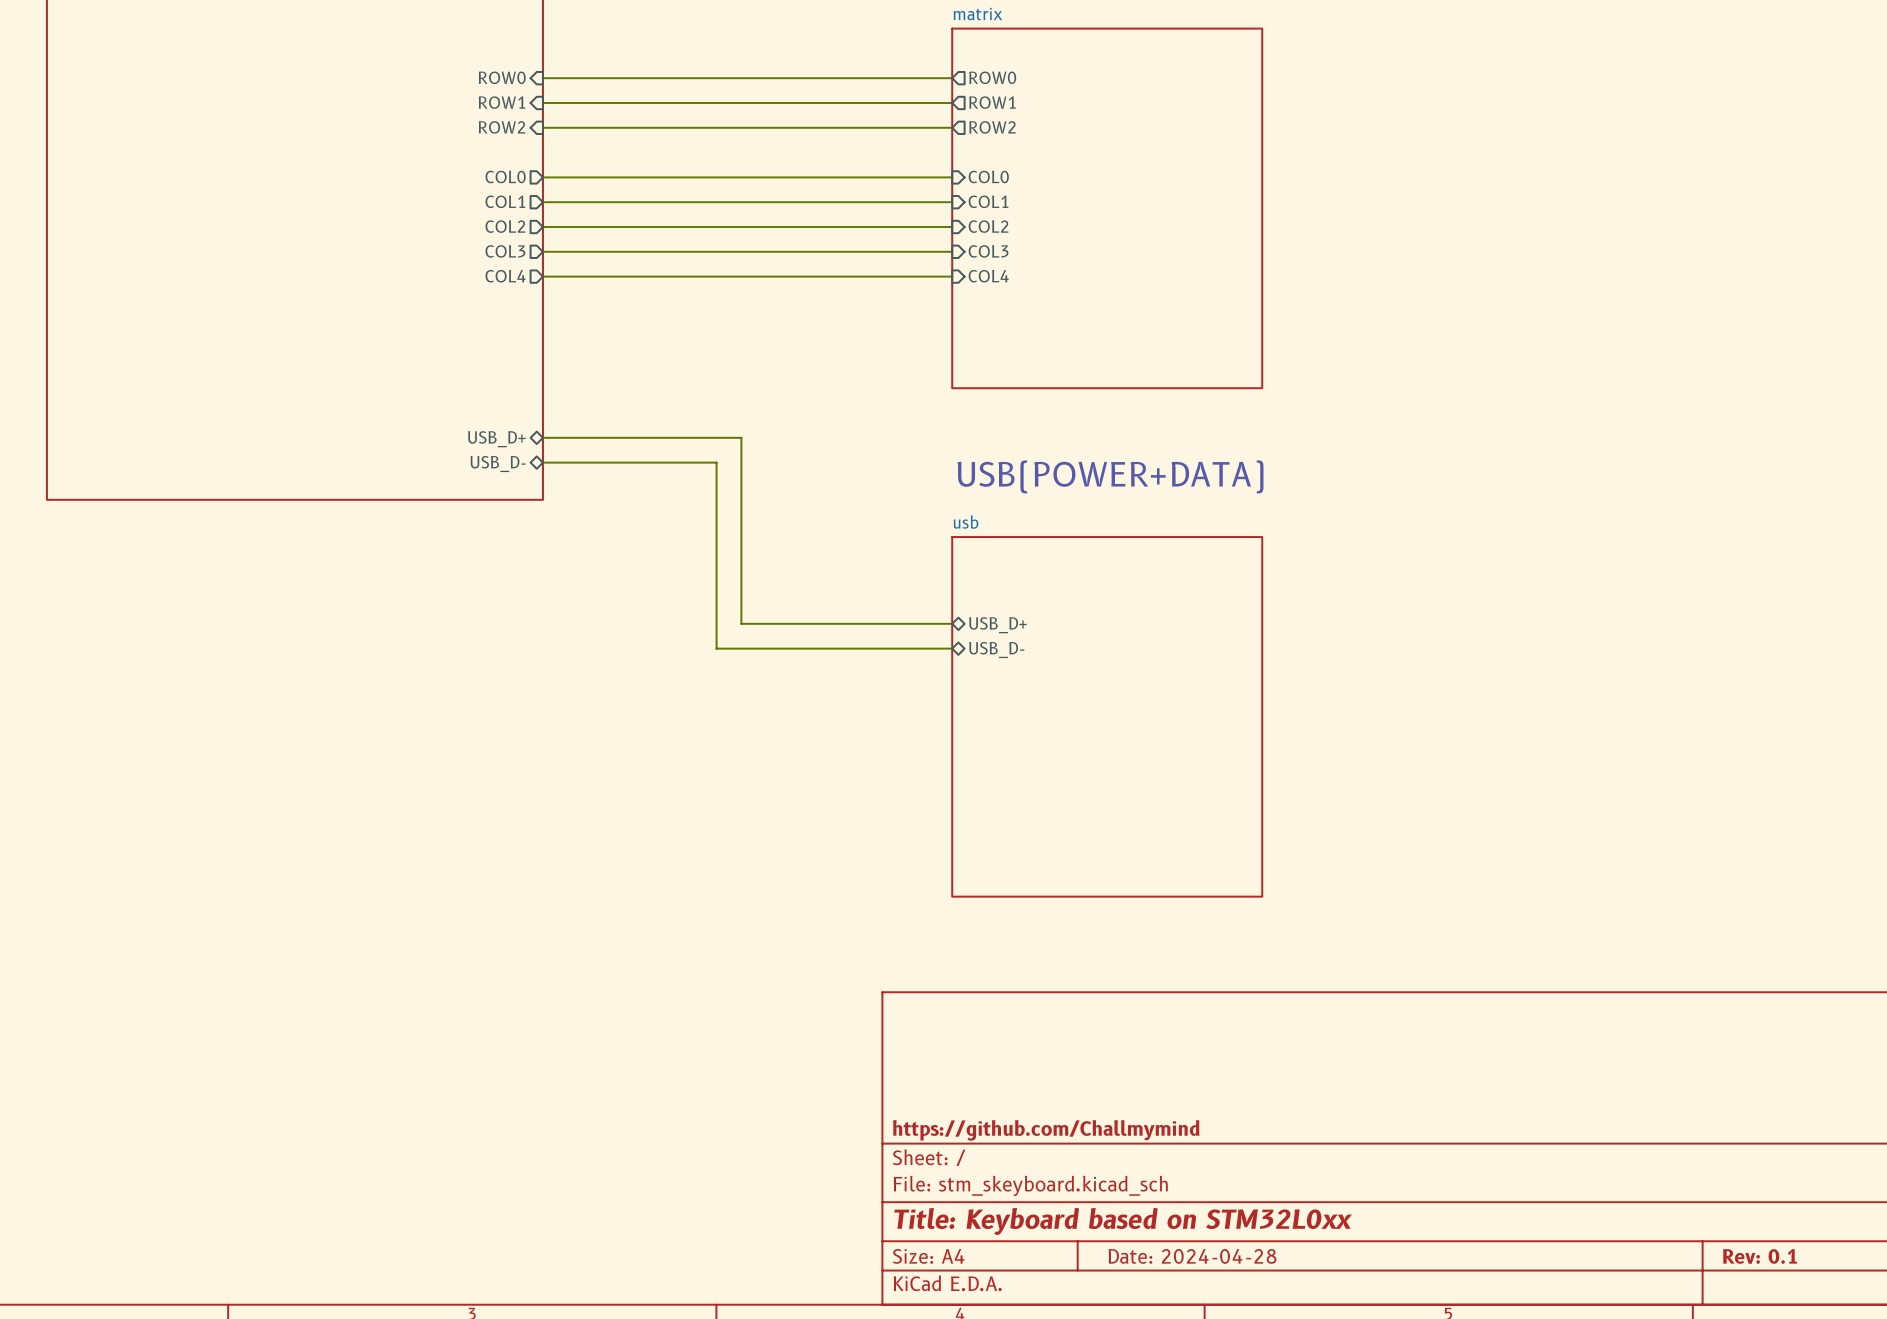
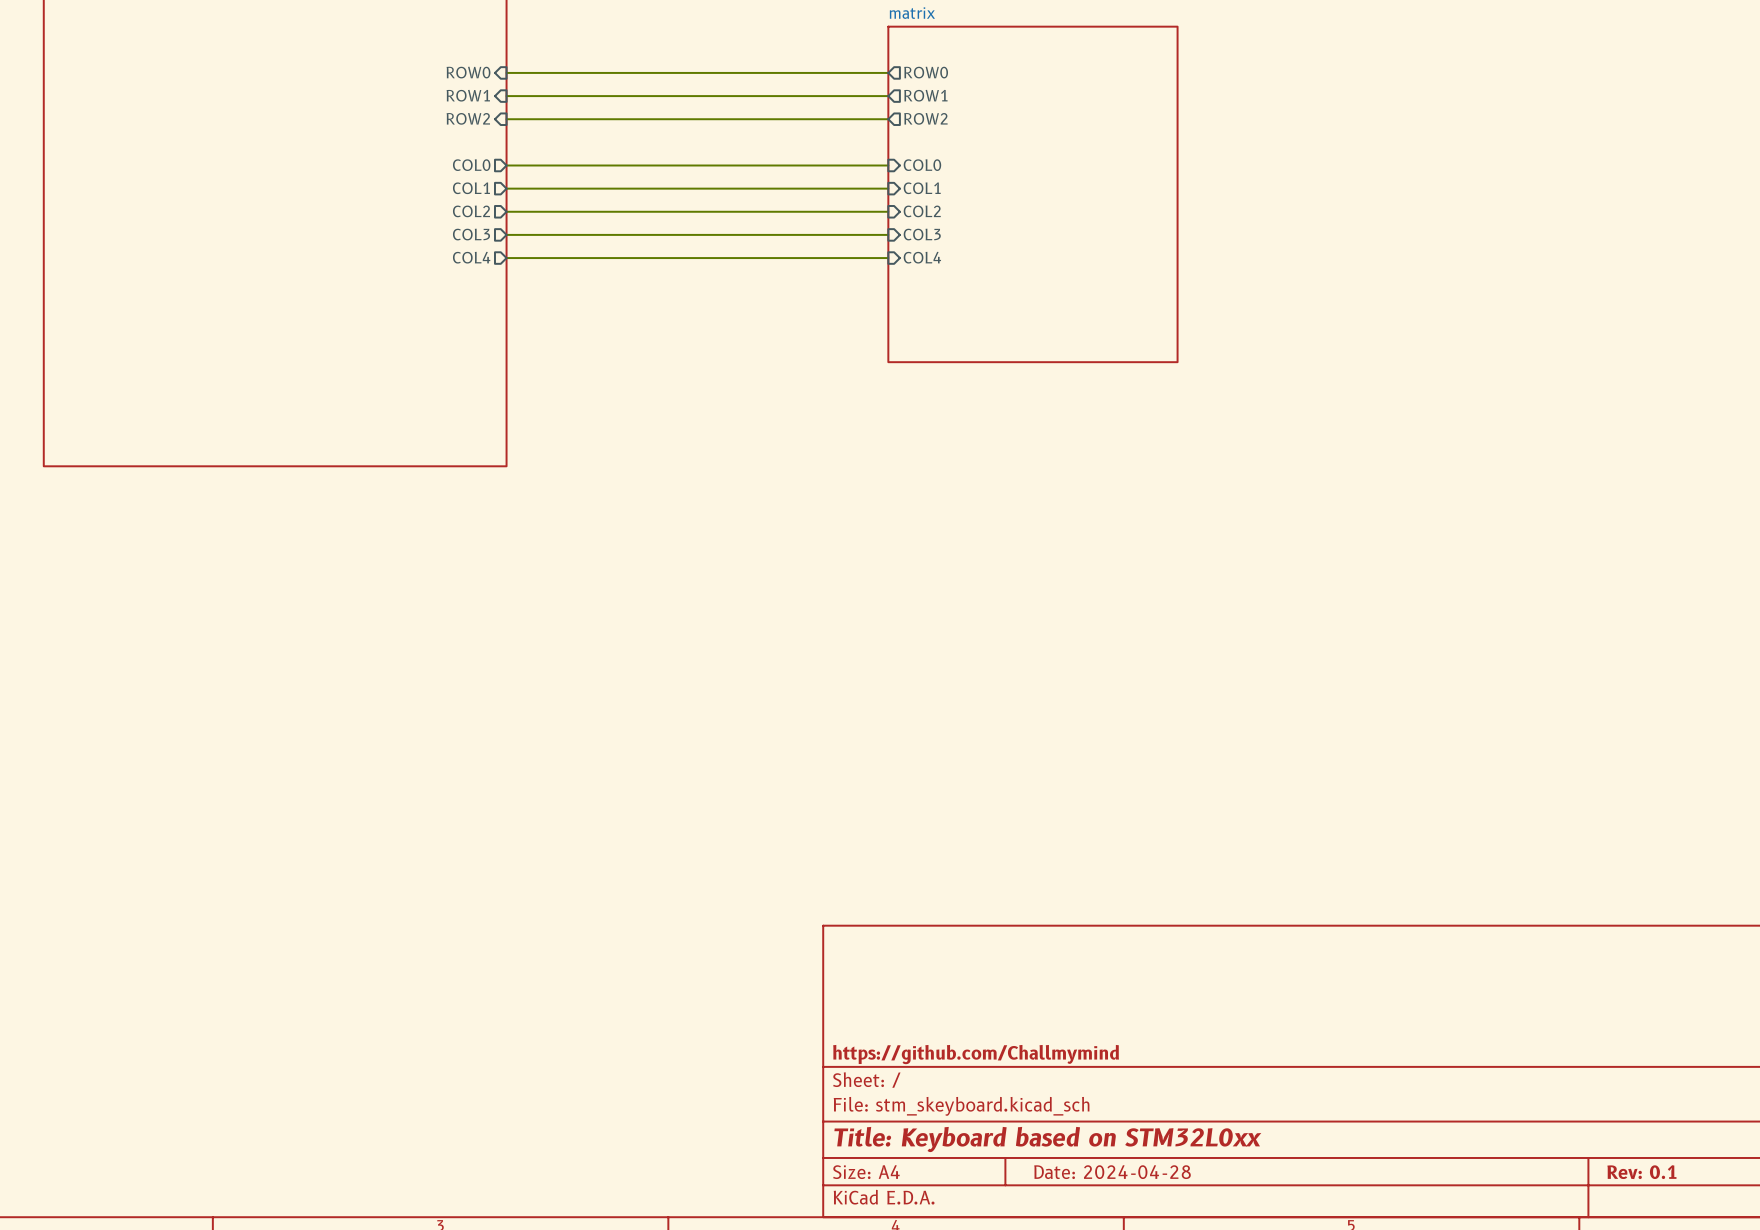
wire: (542, 437) (741, 437) (741, 623) (952, 623) -> none
sheet pin: USB_D+ (496, 439) -> none
wire: (542, 462) (716, 462) (716, 648) (952, 648) -> none
sheet pin: USB_D- (498, 464) -> none
text: USB(POWER+DATA) (1110, 476) -> none
sheet pin: USB_D+ (997, 625) -> none
sheet pin: USB_D- (996, 650) -> none
sheet usb: (1107, 716) -> none

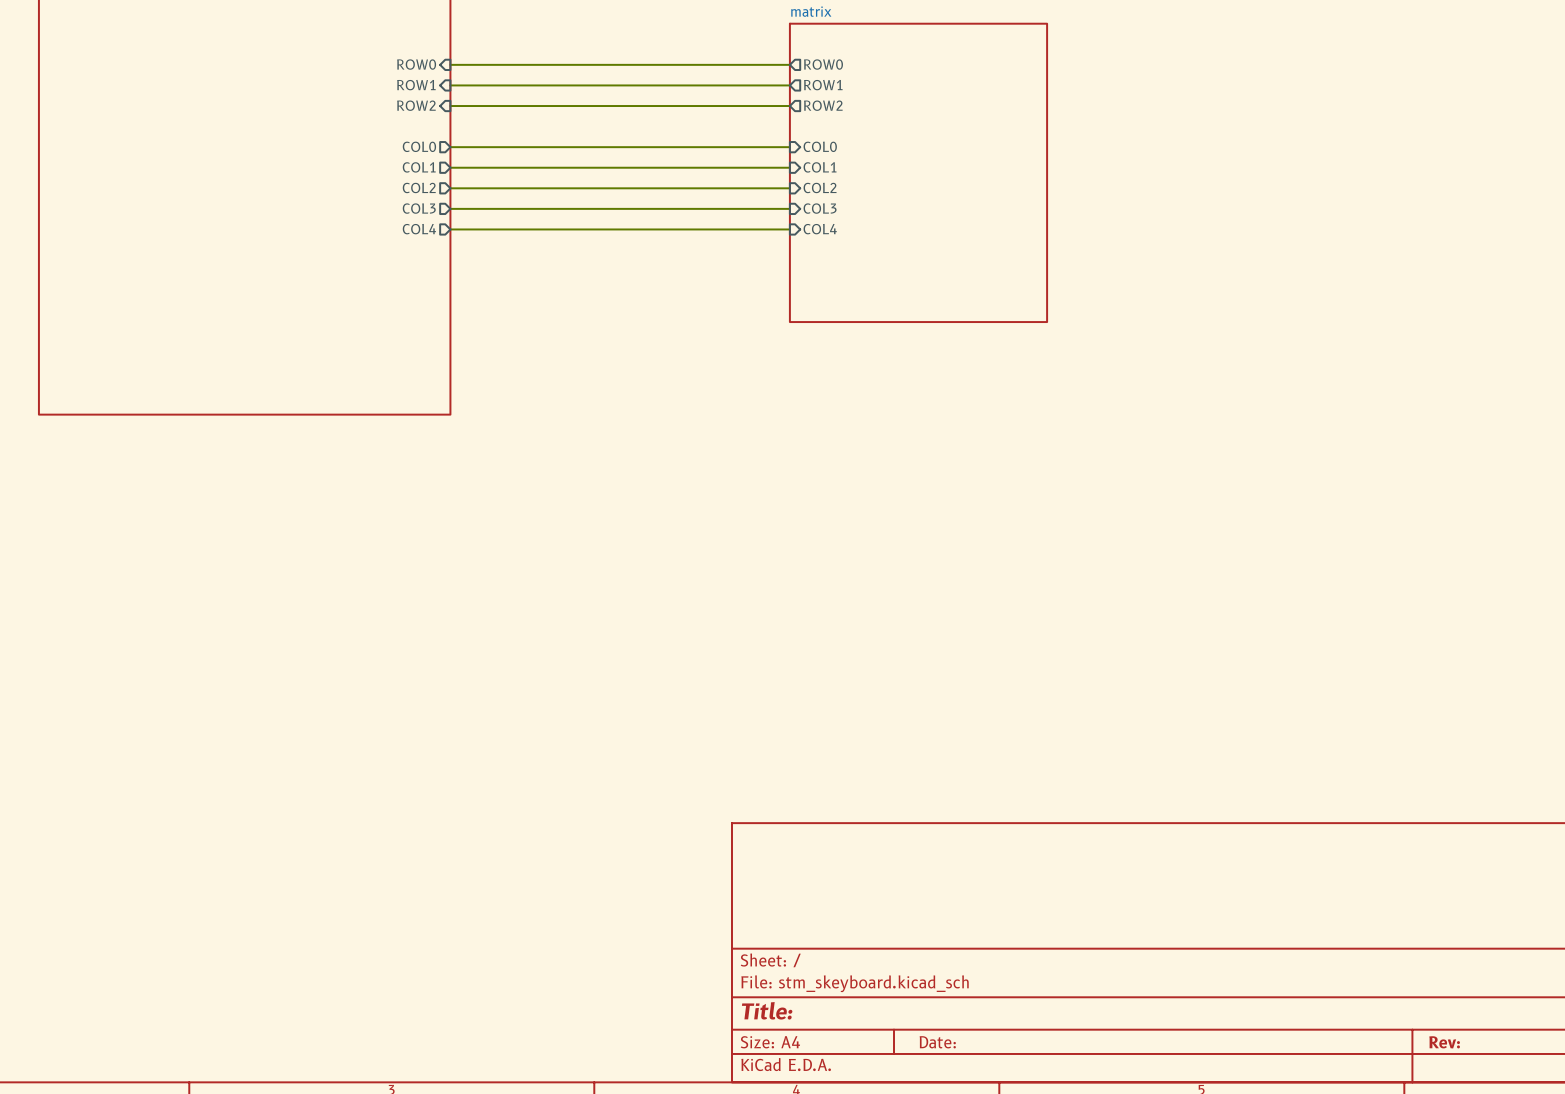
title block: https://github.com/Challmymind (976, 1054) -> none
title block: Title: Keyboard based on STM32L0xx (1047, 1139) -> Title: (767, 1010)
title block: Date: 2024-04-28 (1112, 1172) -> Date: (937, 1042)
title block: Rev: 0.1 (1641, 1172) -> Rev: (1444, 1042)

